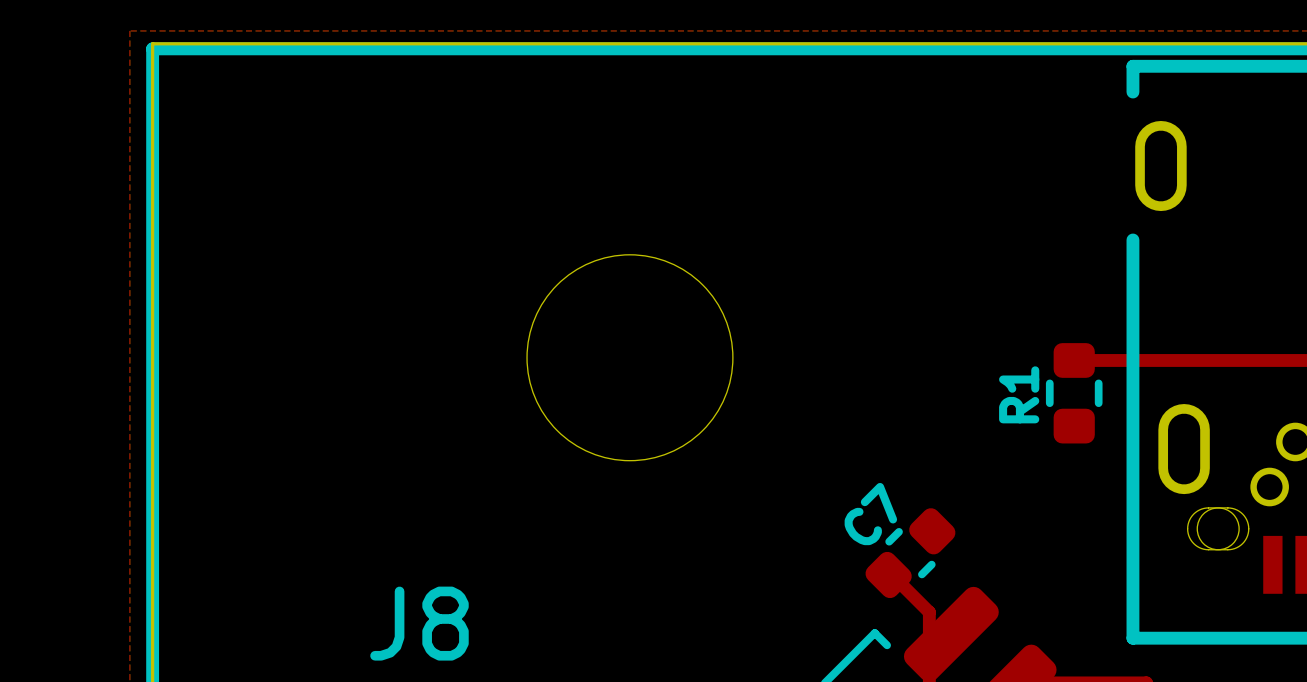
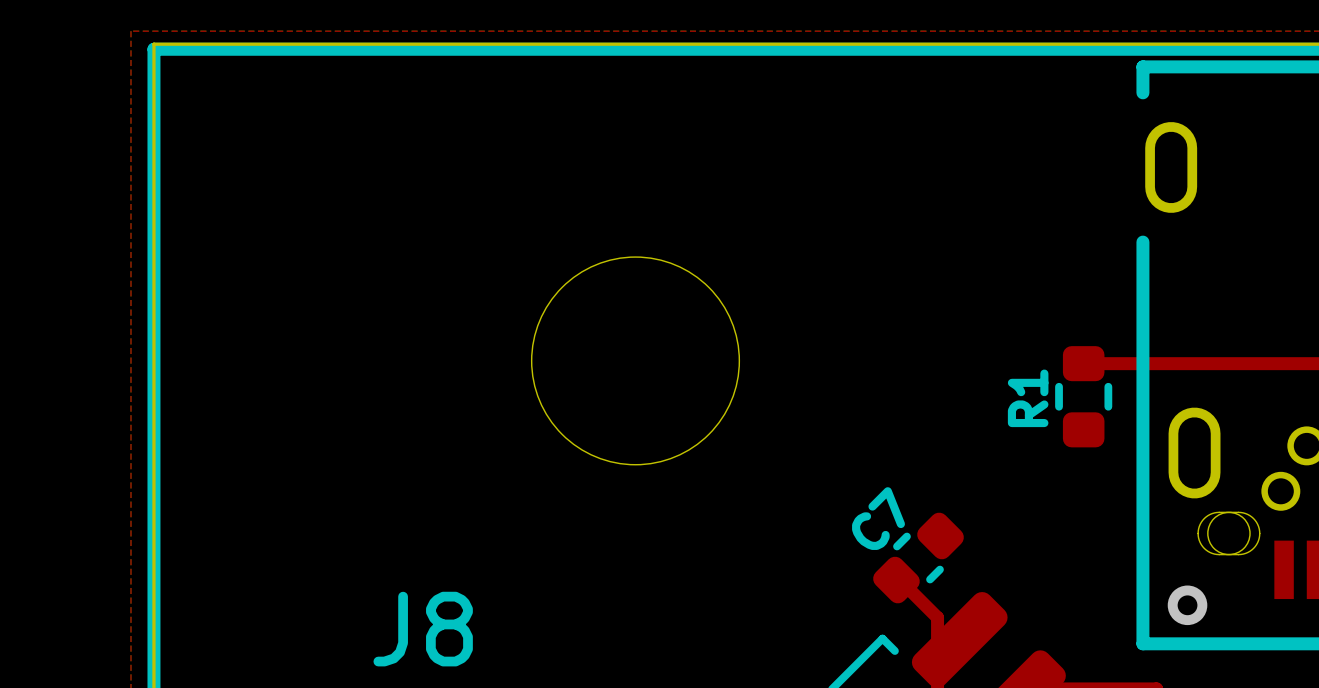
via: none -> (1187, 605)

